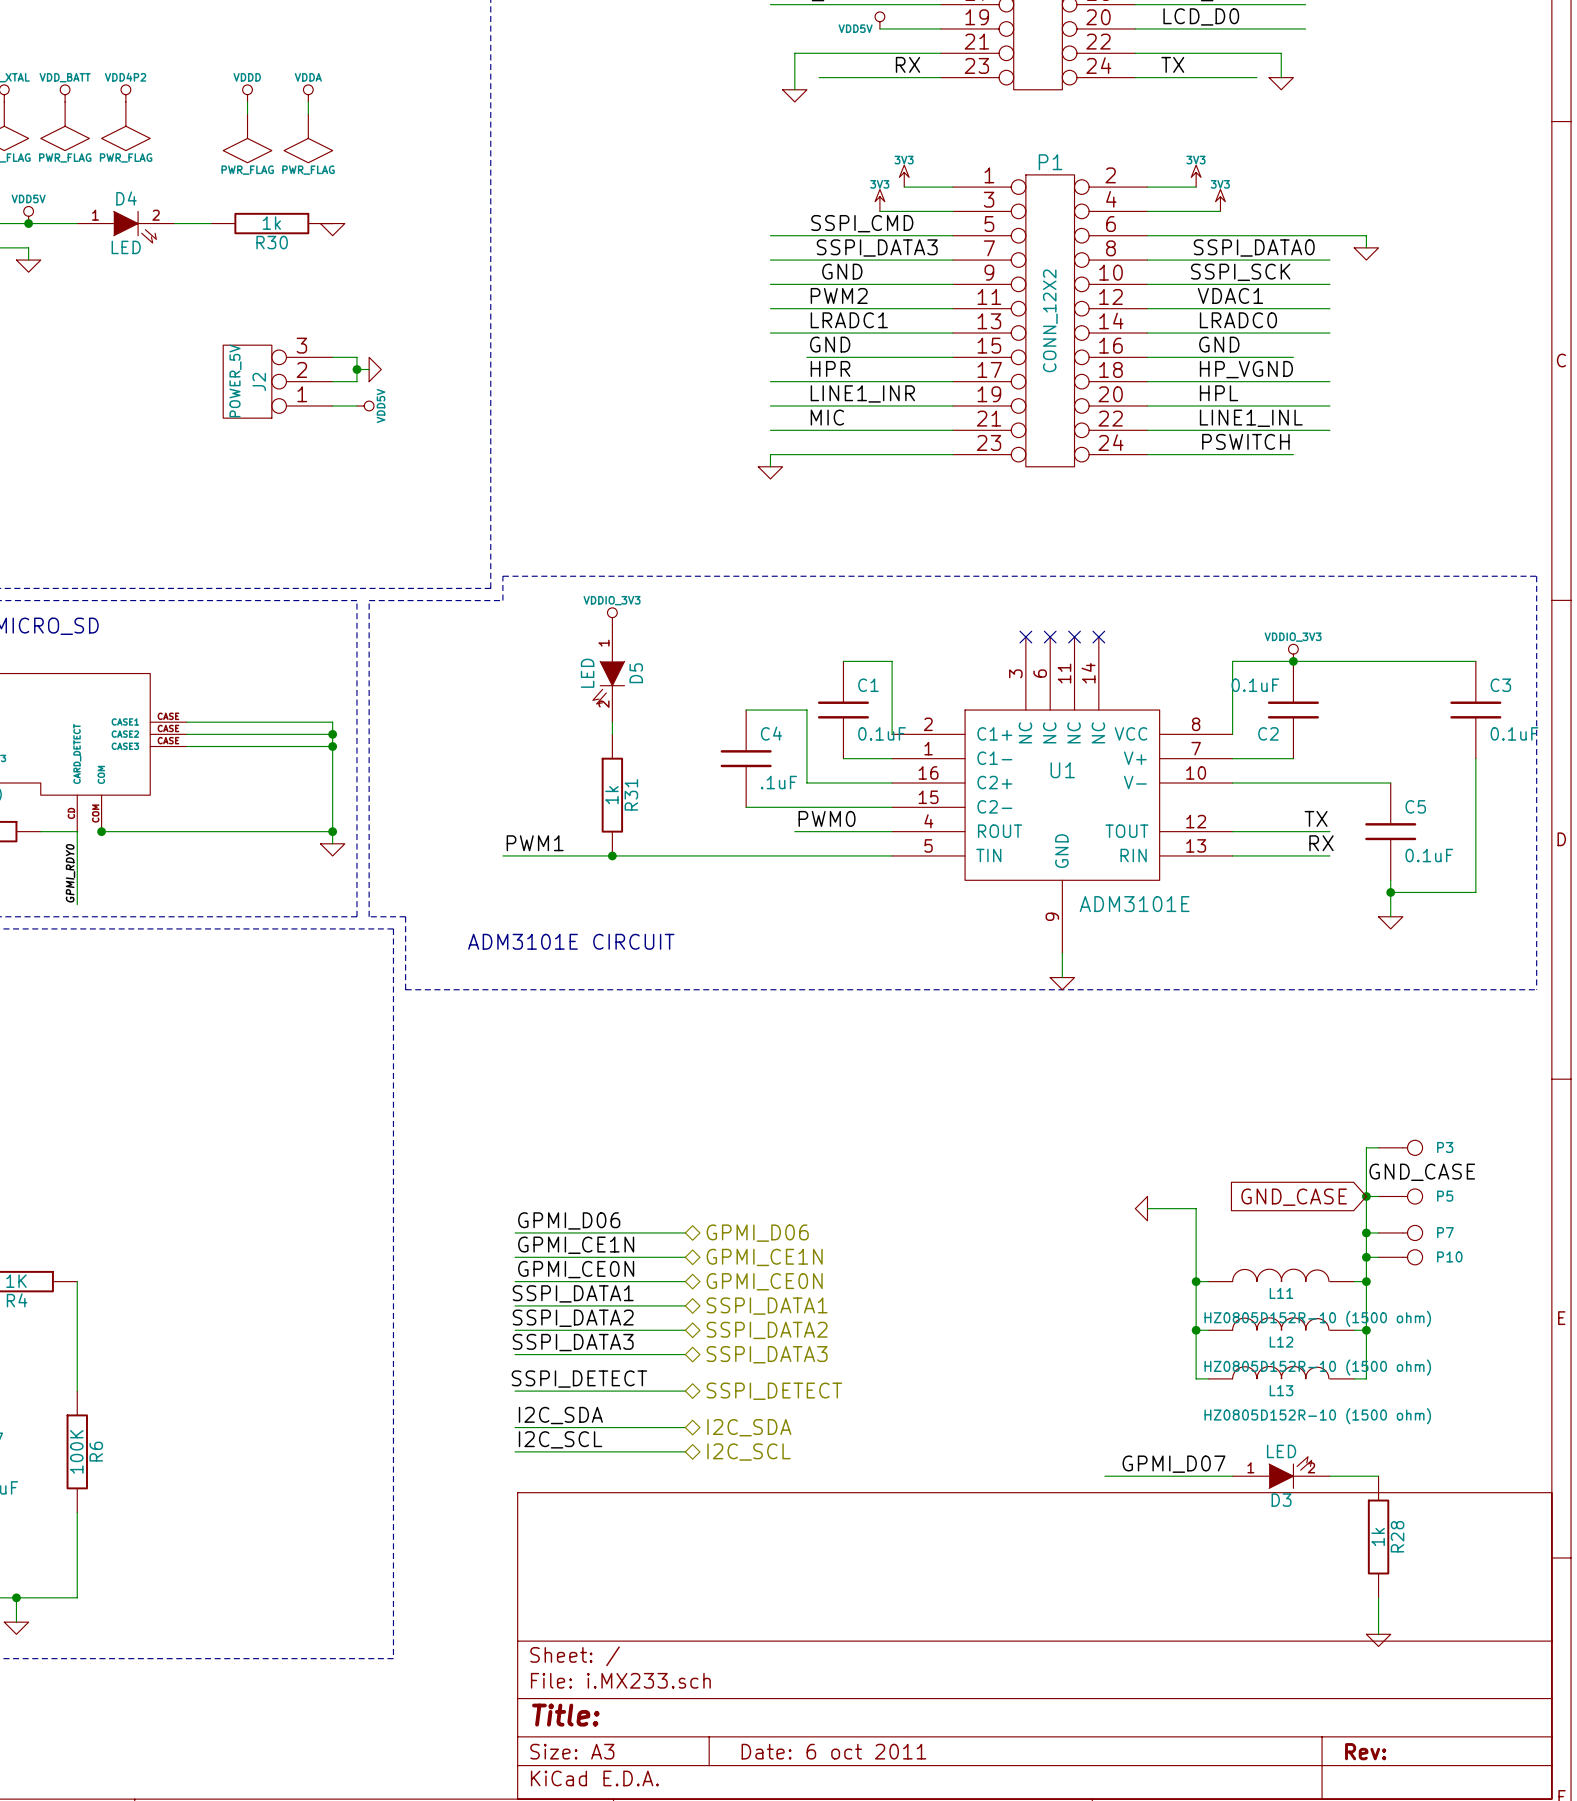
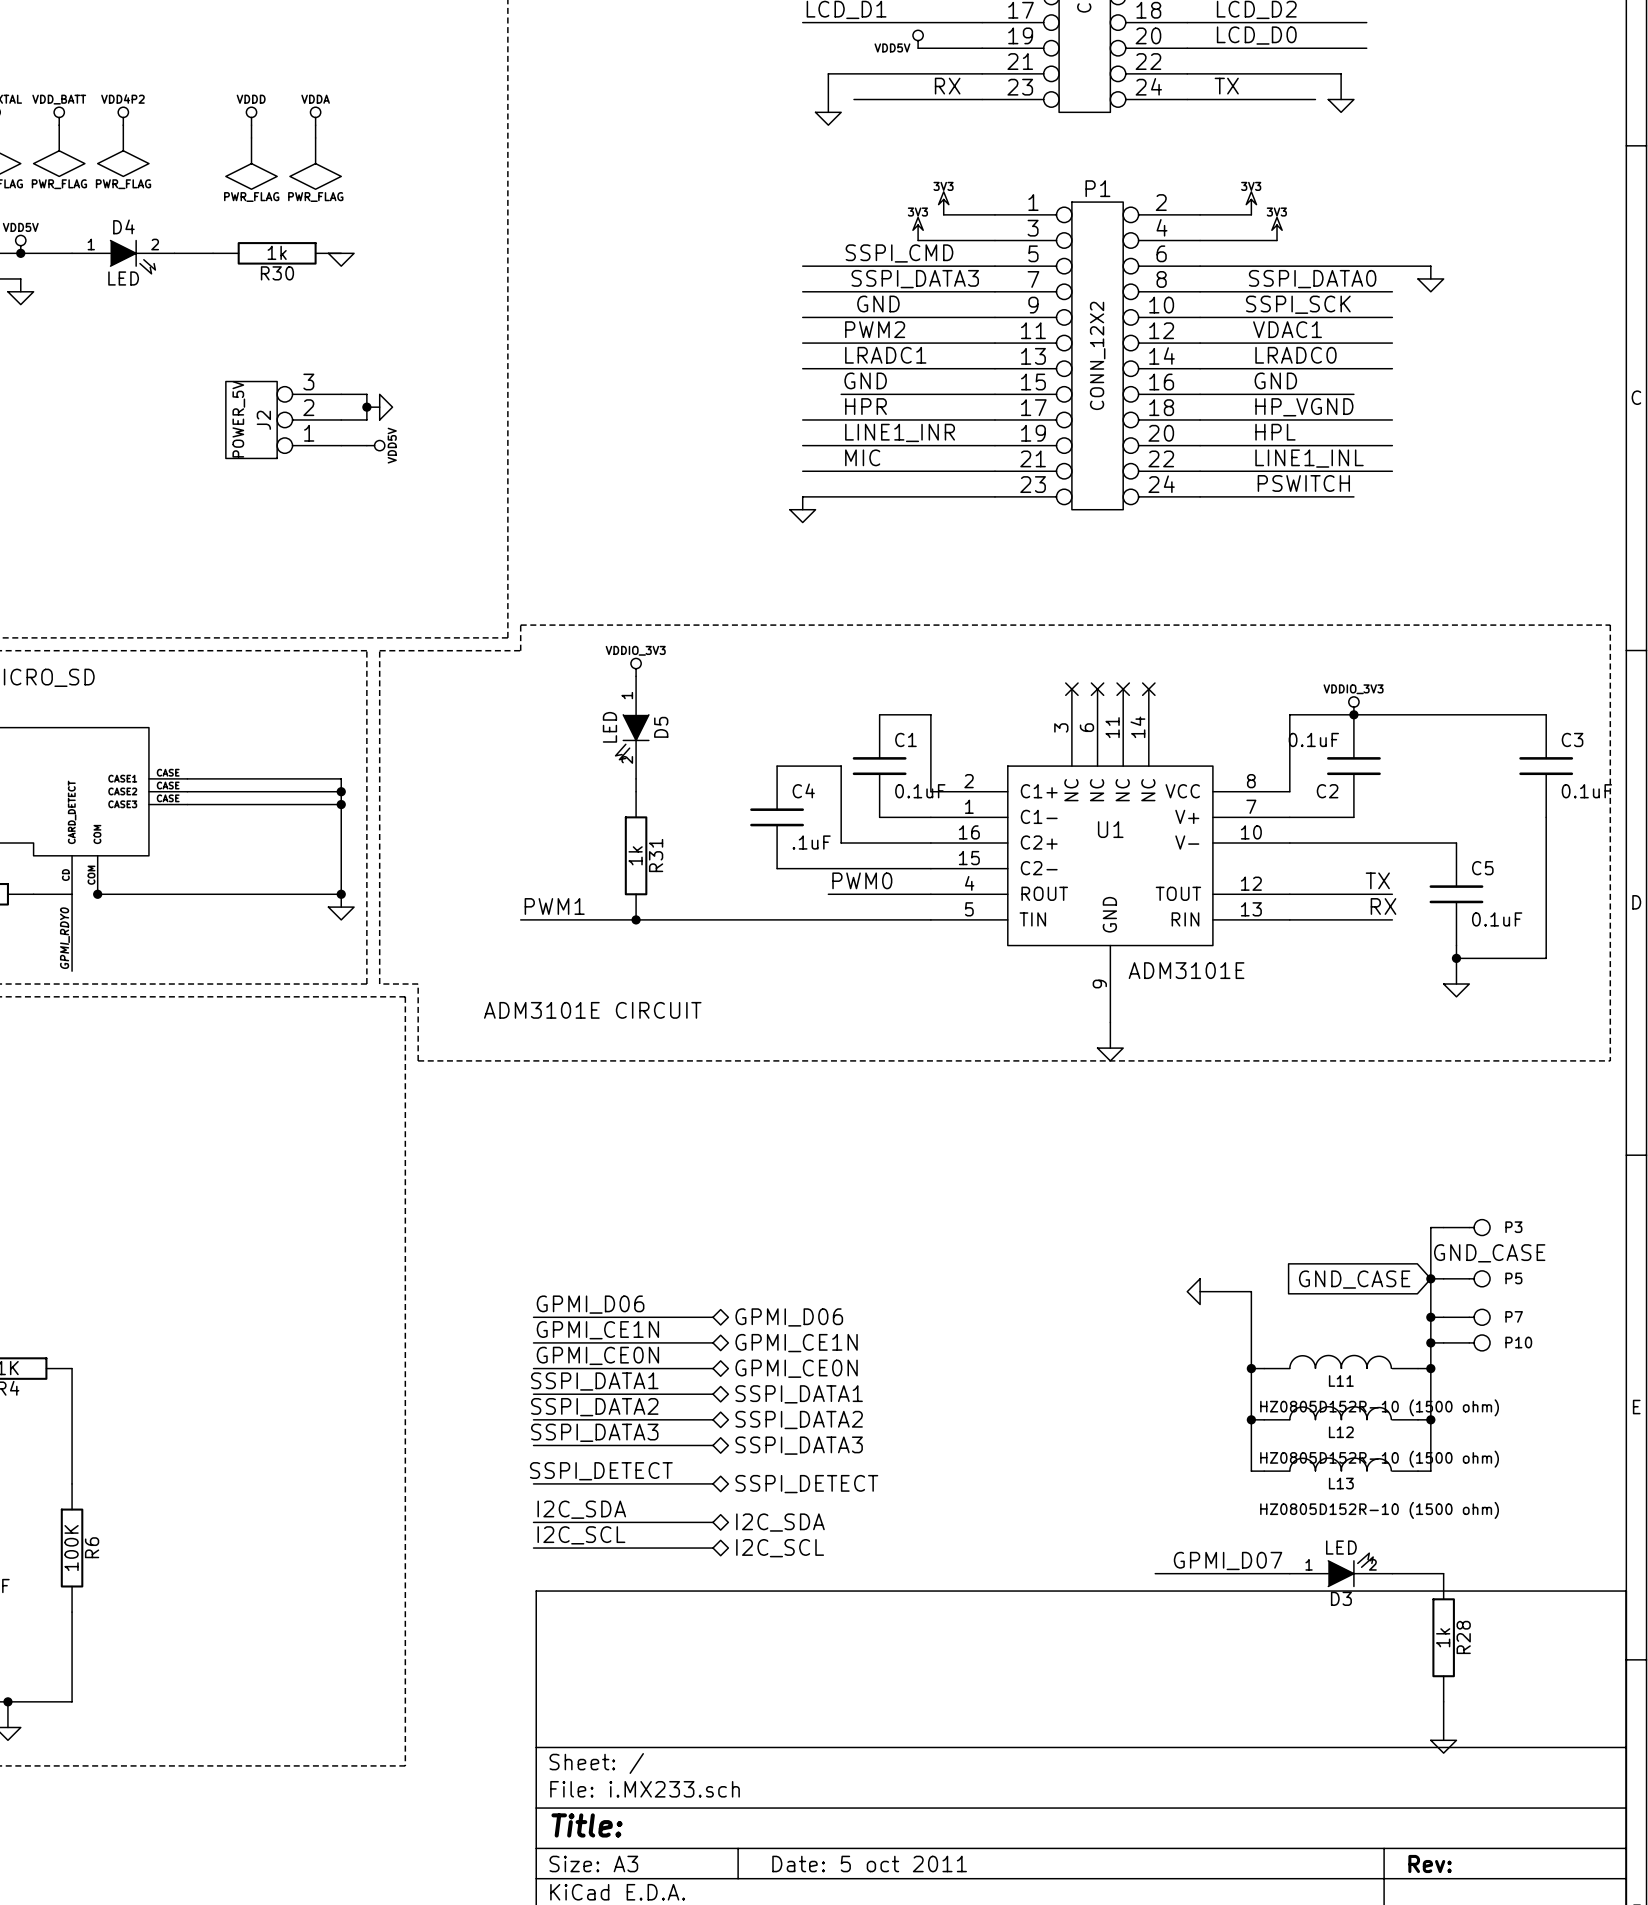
title block: Date: 6 oct 2011 (833, 1751) -> Date: 5 oct 2011 (869, 1863)

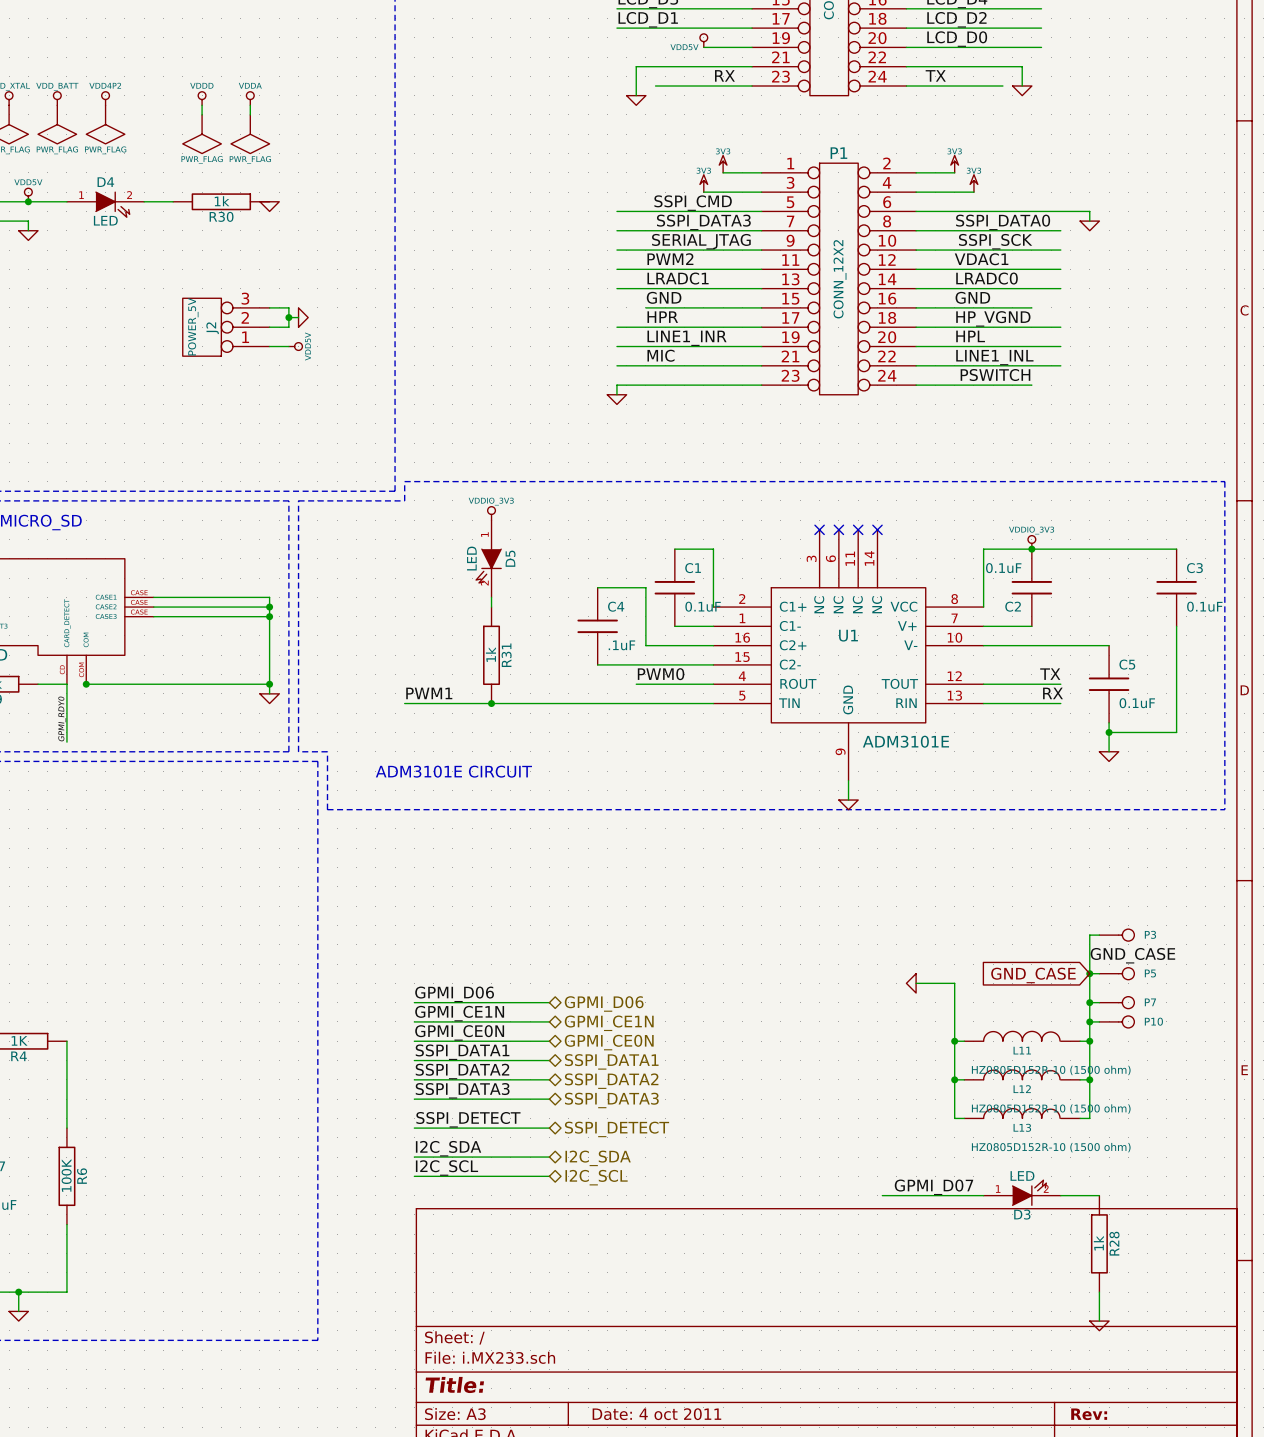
label: GND (878, 304) -> none
label: none -> SERIAL_JTAG (701, 241)
title block: Date: 5 oct 2011 (869, 1863) -> Date: 4 oct 2011 (656, 1414)

